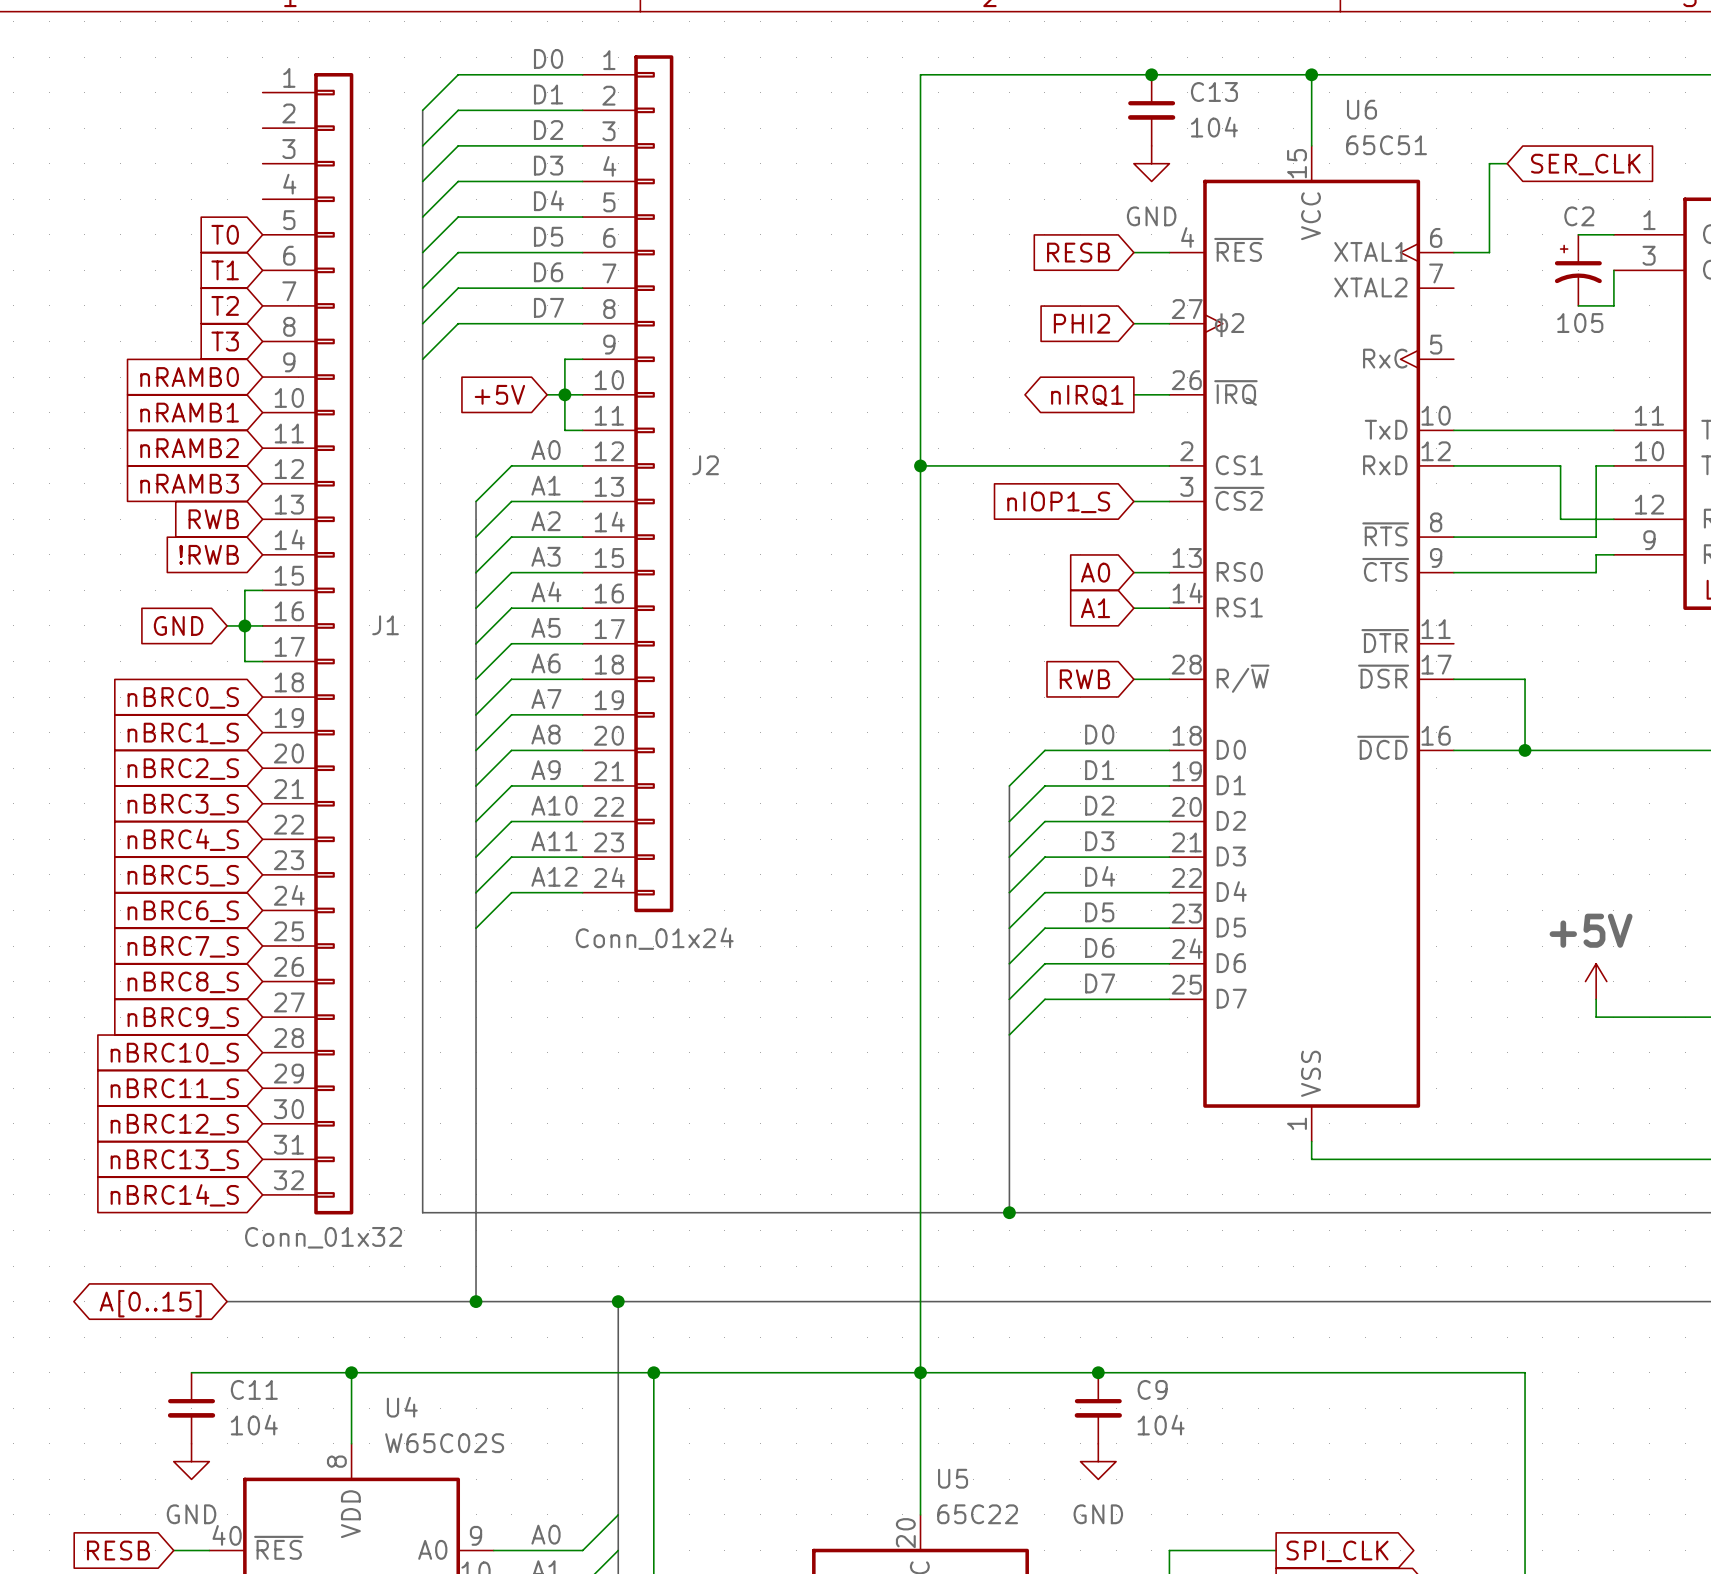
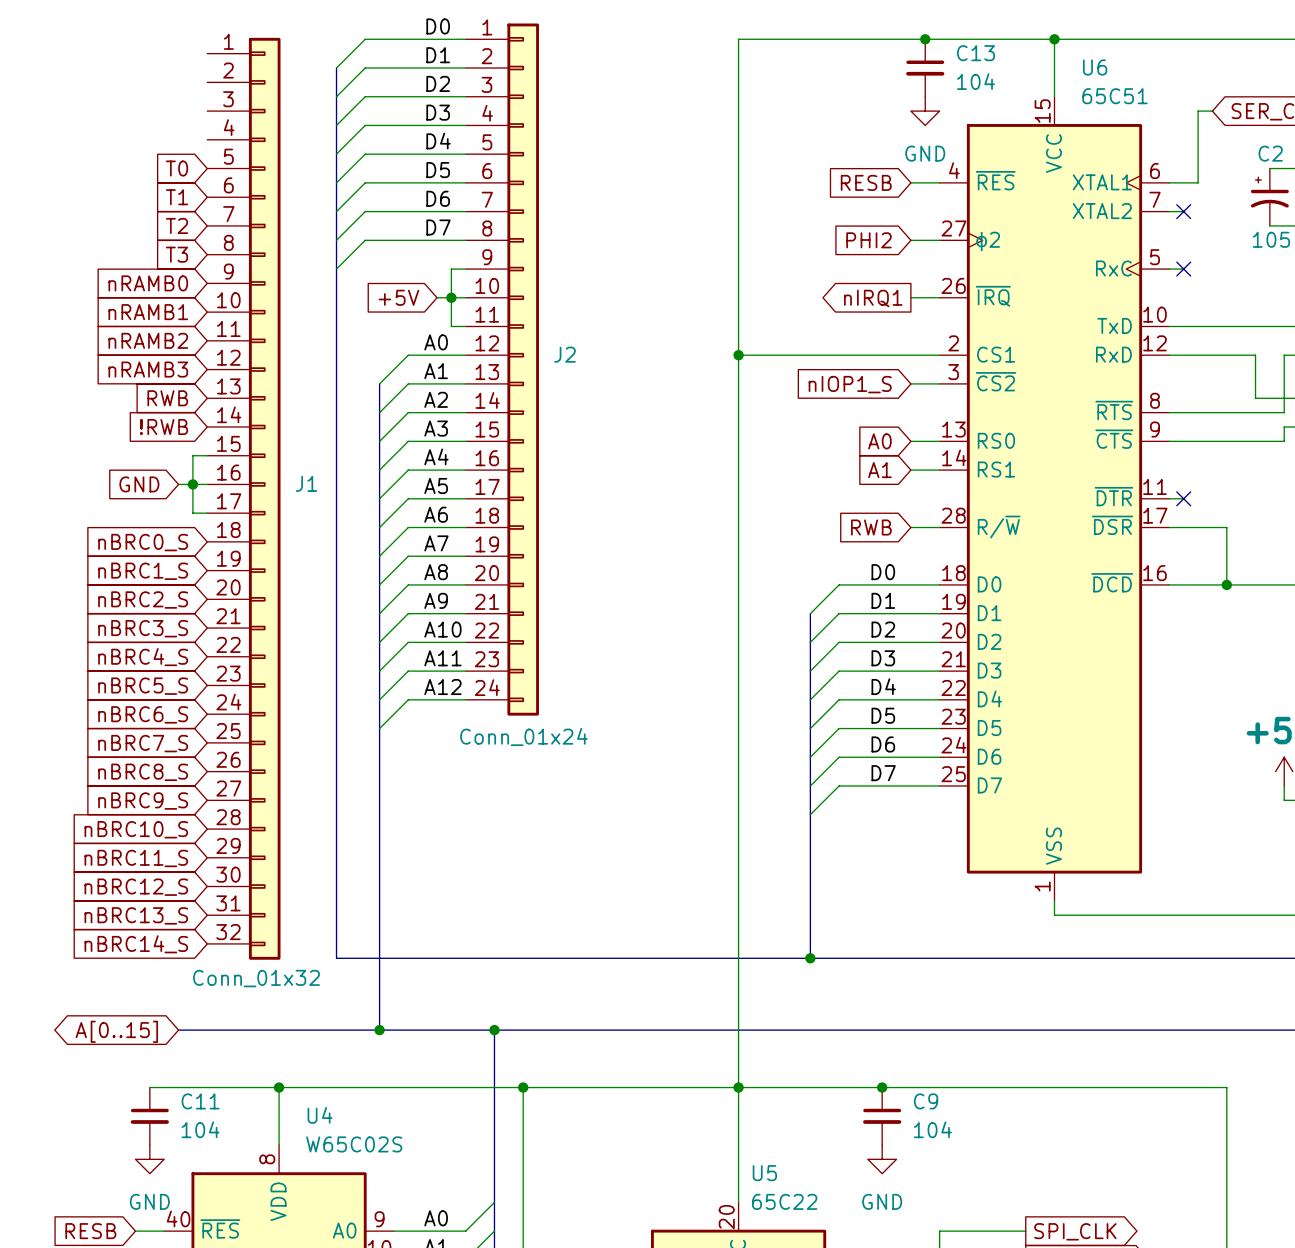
wire: none -> (1169, 211) (1183, 211)
no-connect mark: none -> (1183, 211)
wire: none -> (1169, 269) (1183, 269)
no-connect mark: none -> (1183, 269)
wire: none -> (1169, 498) (1183, 498)
no-connect mark: none -> (1183, 498)

